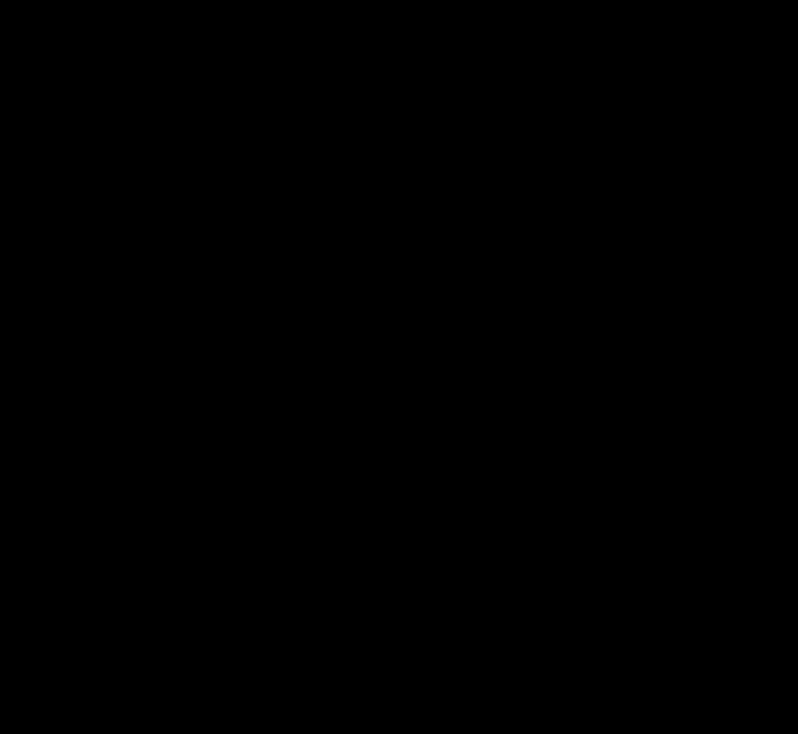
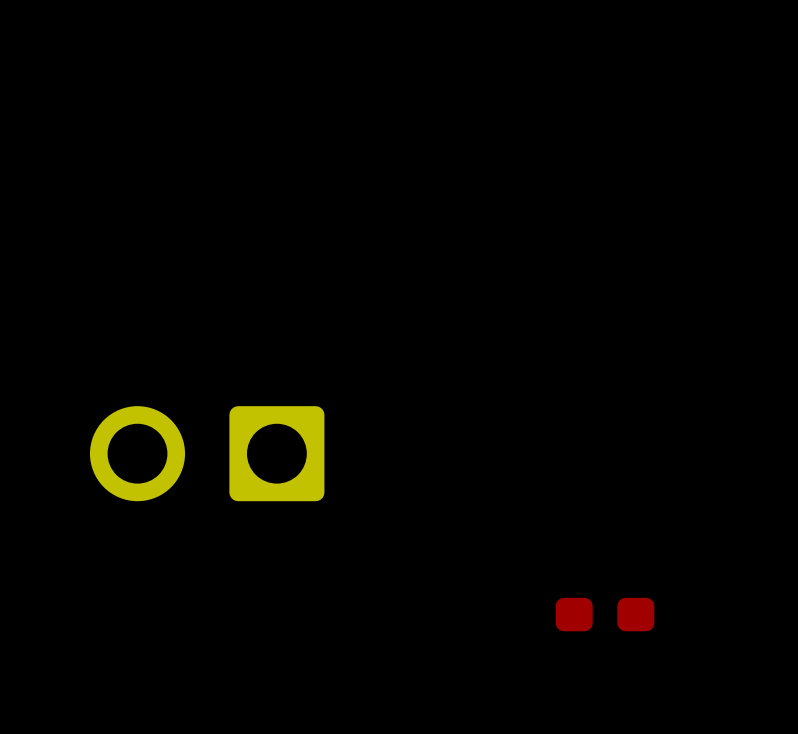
part: none -> (207, 453)
part: none -> (605, 614)

